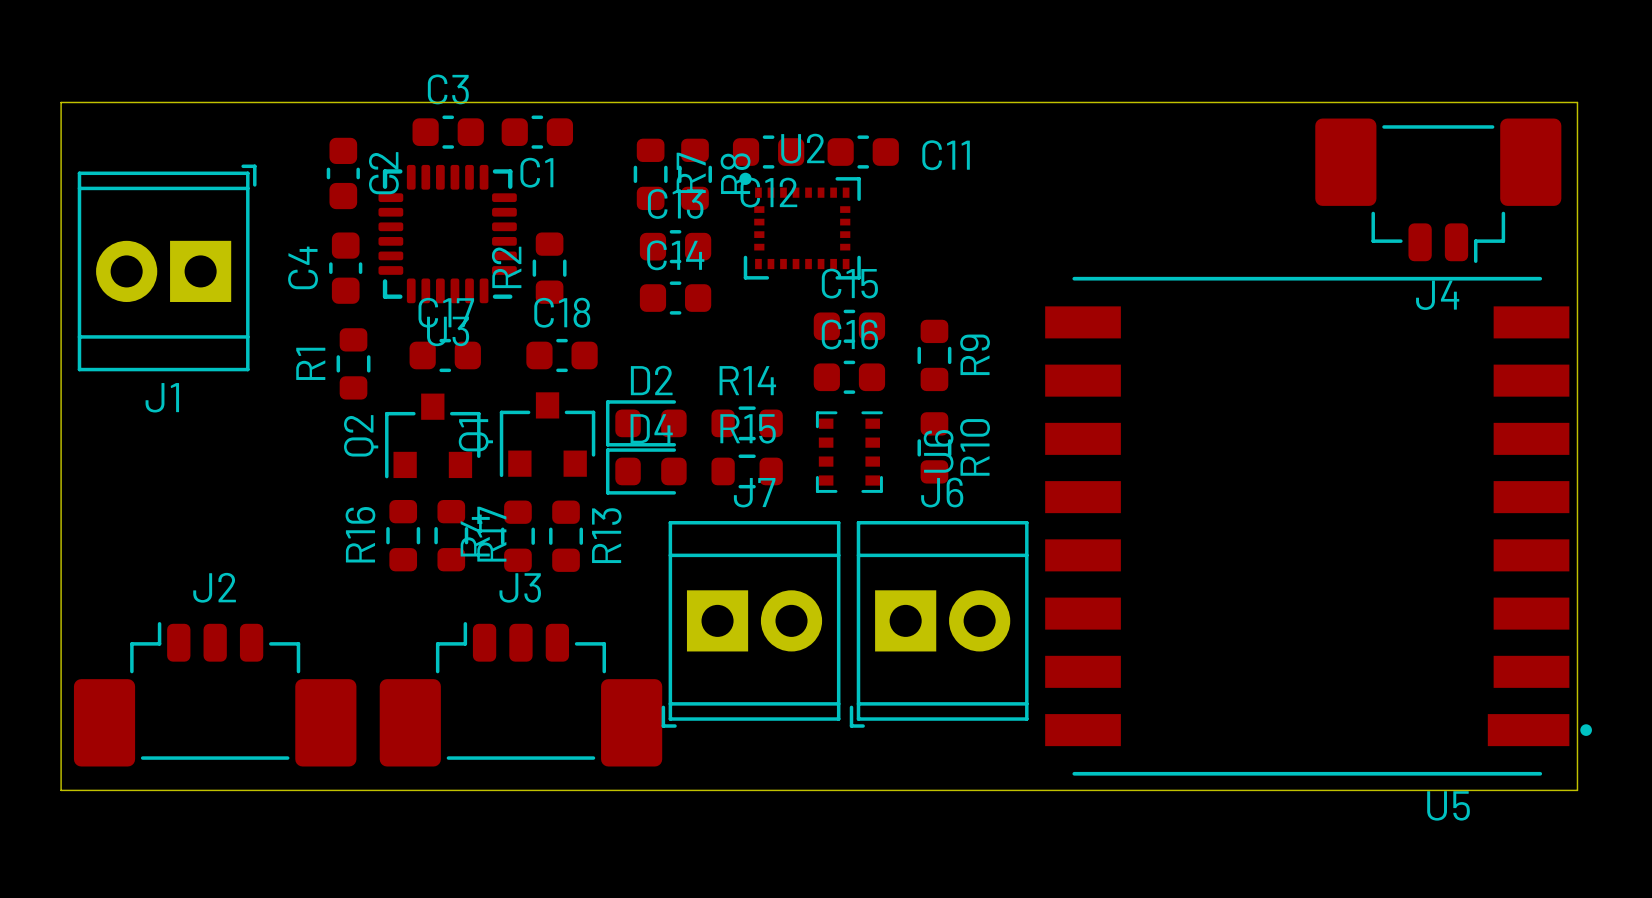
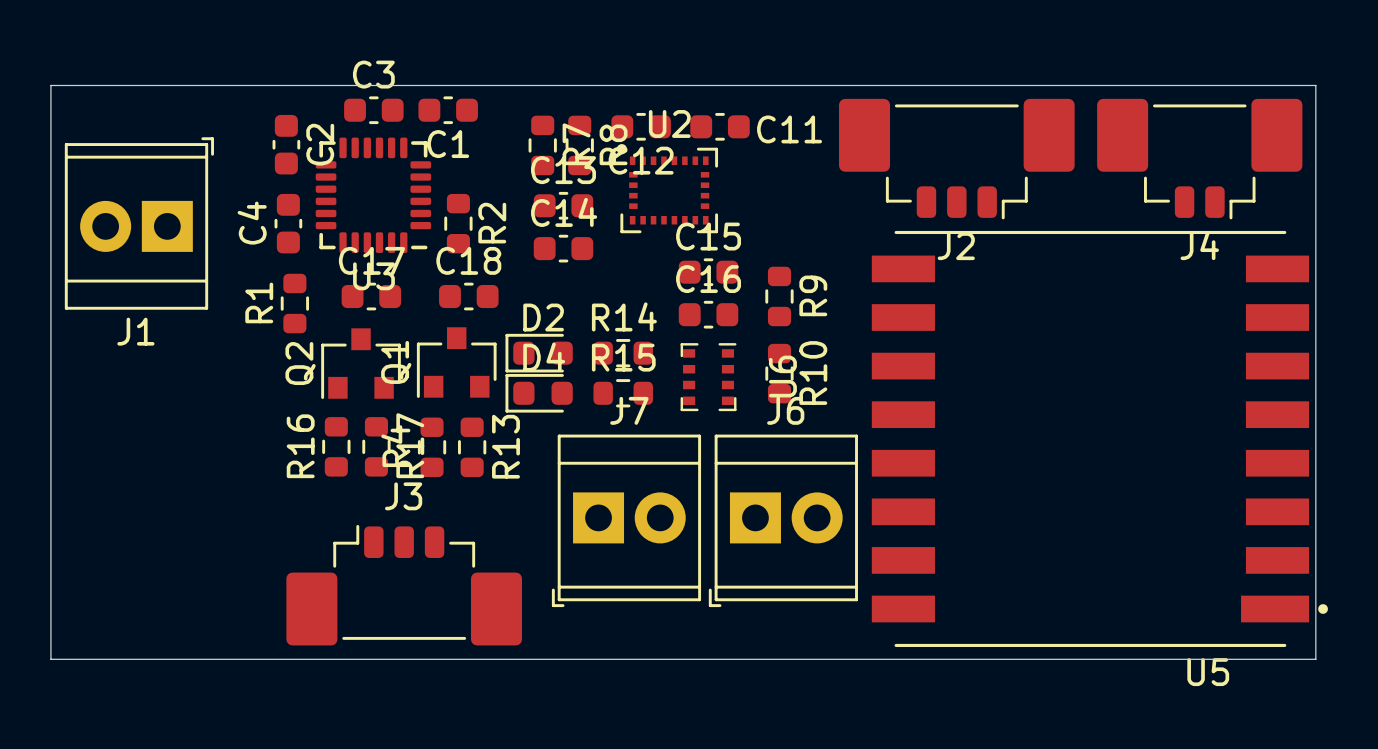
R2 name position: R2 (506, 267) -> R2 (492, 223)
J2 rotation: 0° (215, 694) -> 180° (956, 159)
J2 position: (215, 694) -> (956, 159)
J3 position: (520, 694) -> (404, 585)

